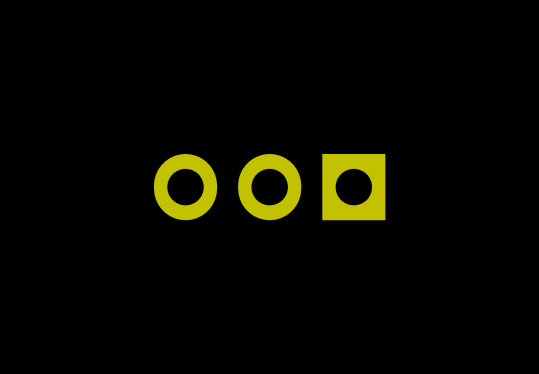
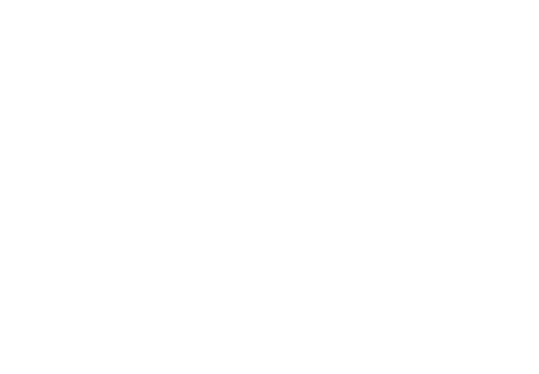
part: (269, 187) -> none

